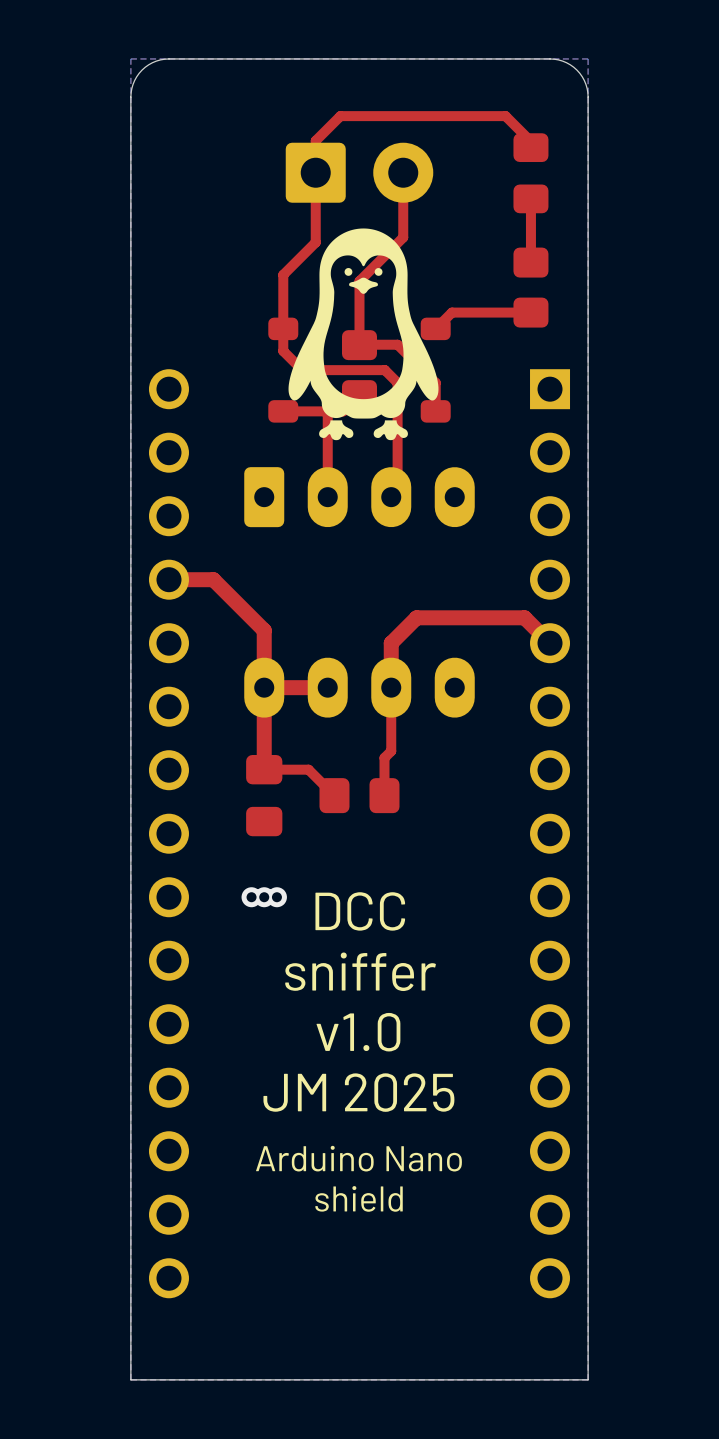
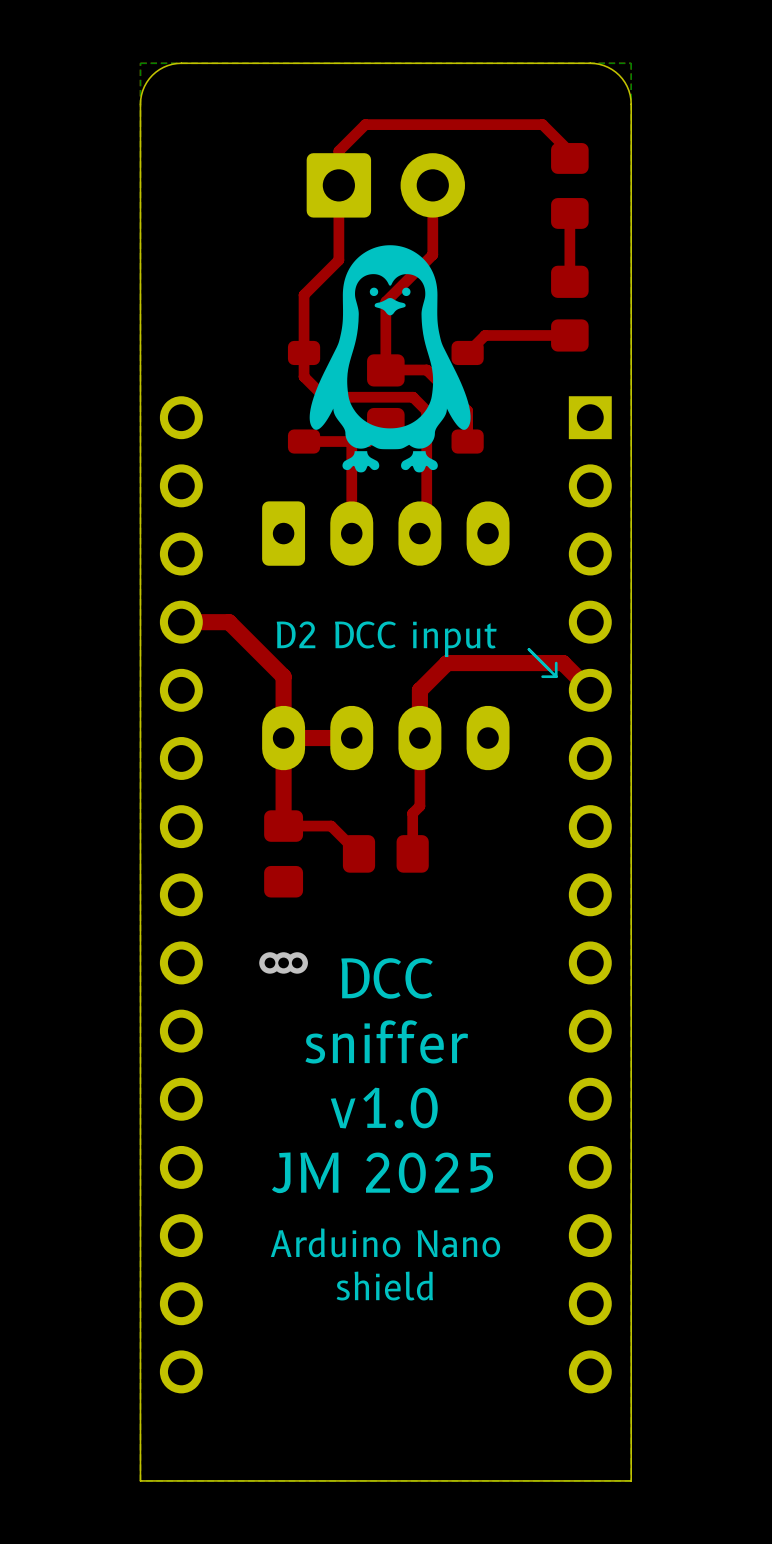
text: none -> D2 DCC input (386, 639)
line: none -> (528, 649) (556, 676)
line: none -> (556, 663) (556, 676)
line: none -> (556, 676) (542, 676)

